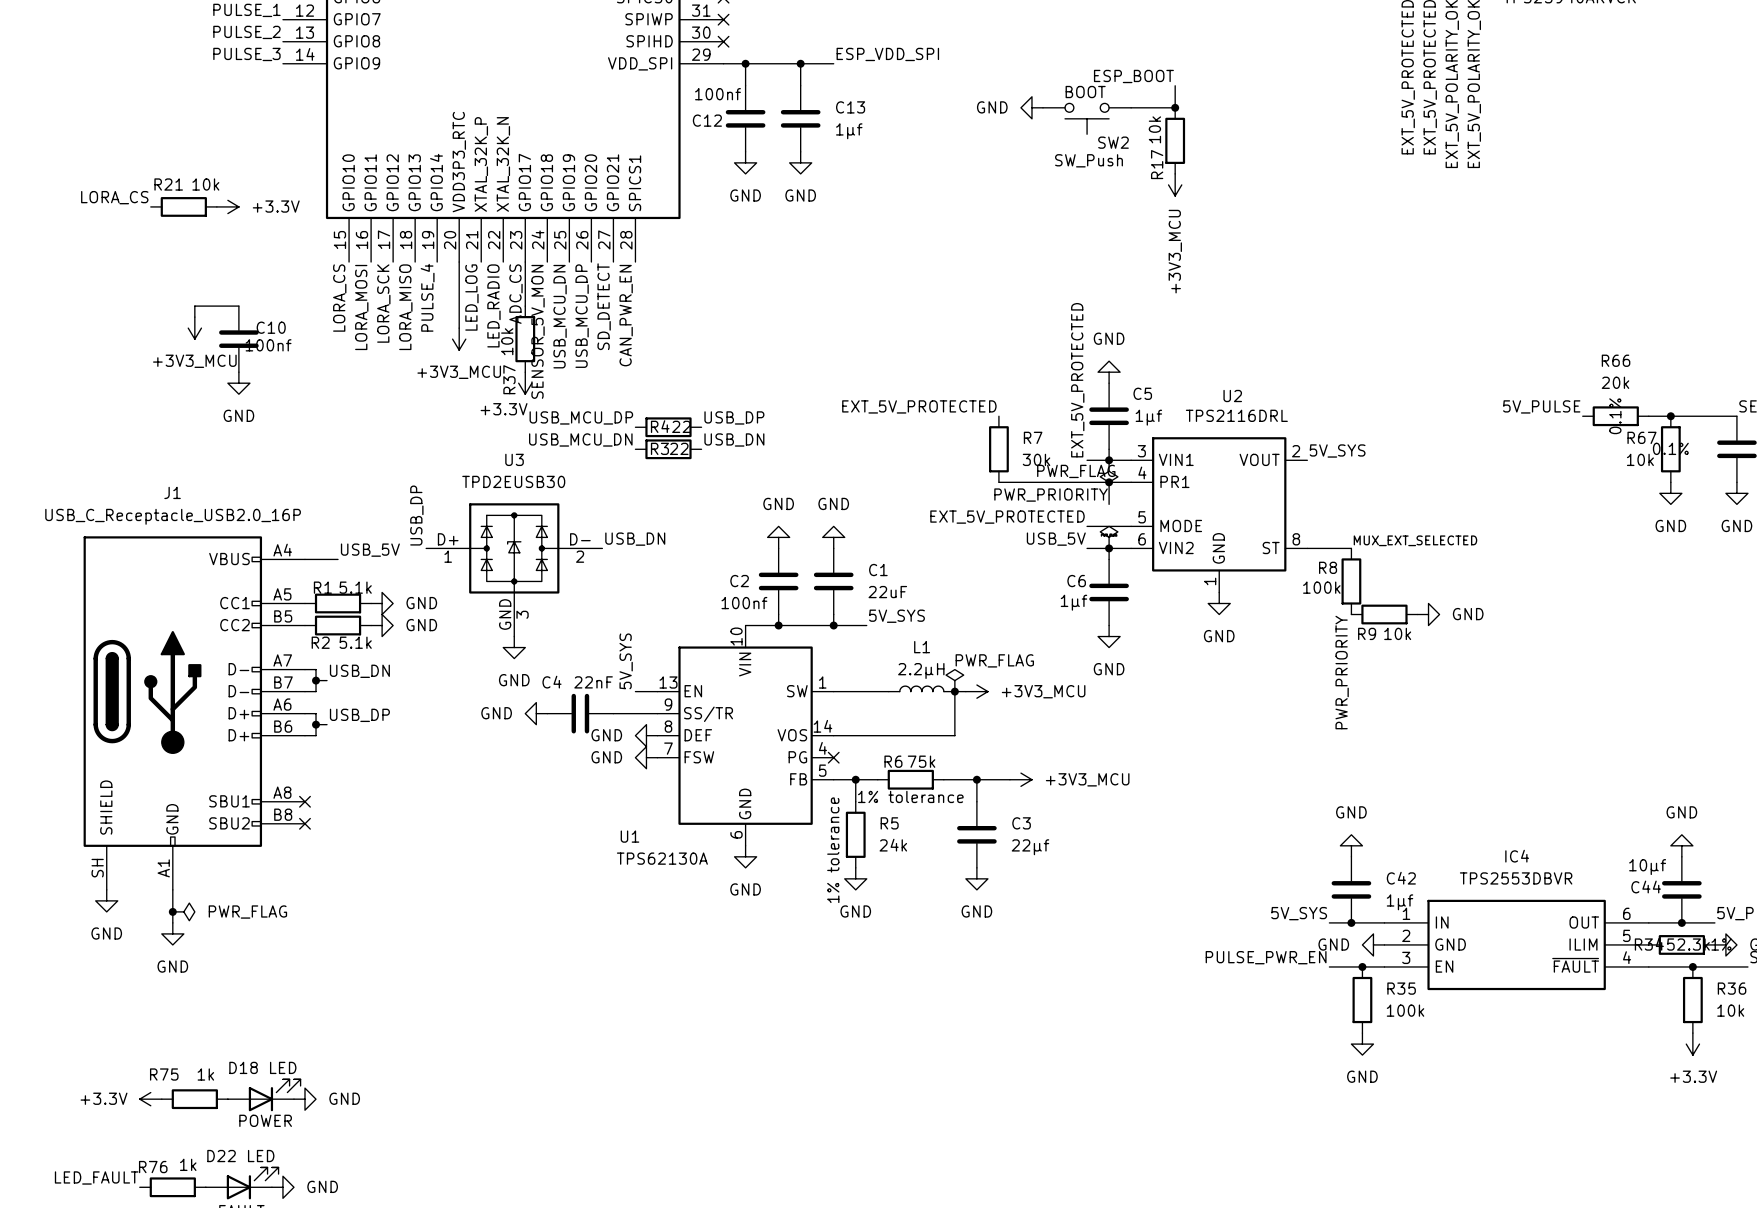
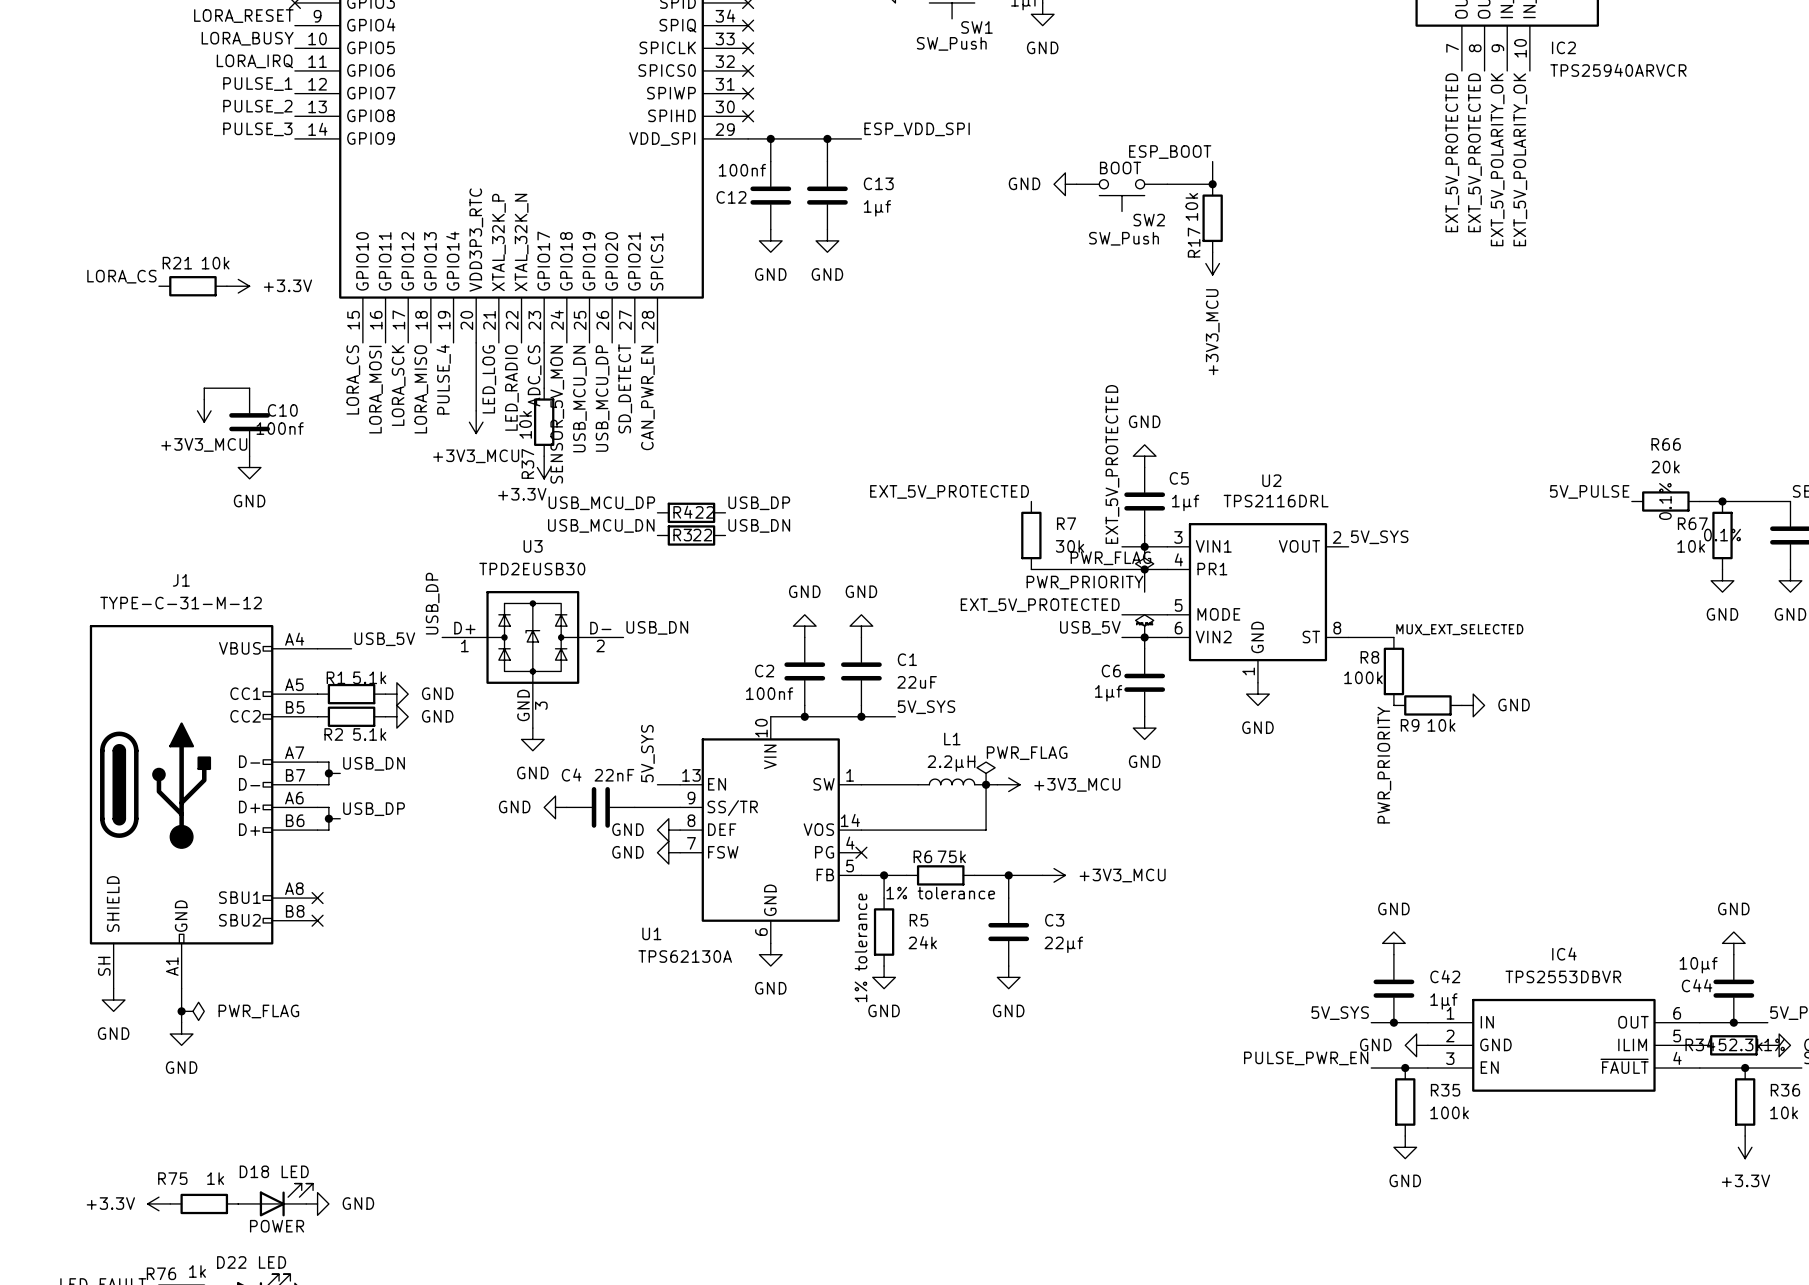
J1 value: USB_C_Receptacle_USB2.0_16P (173, 516) -> TYPE-C-31-M-12 (181, 603)

